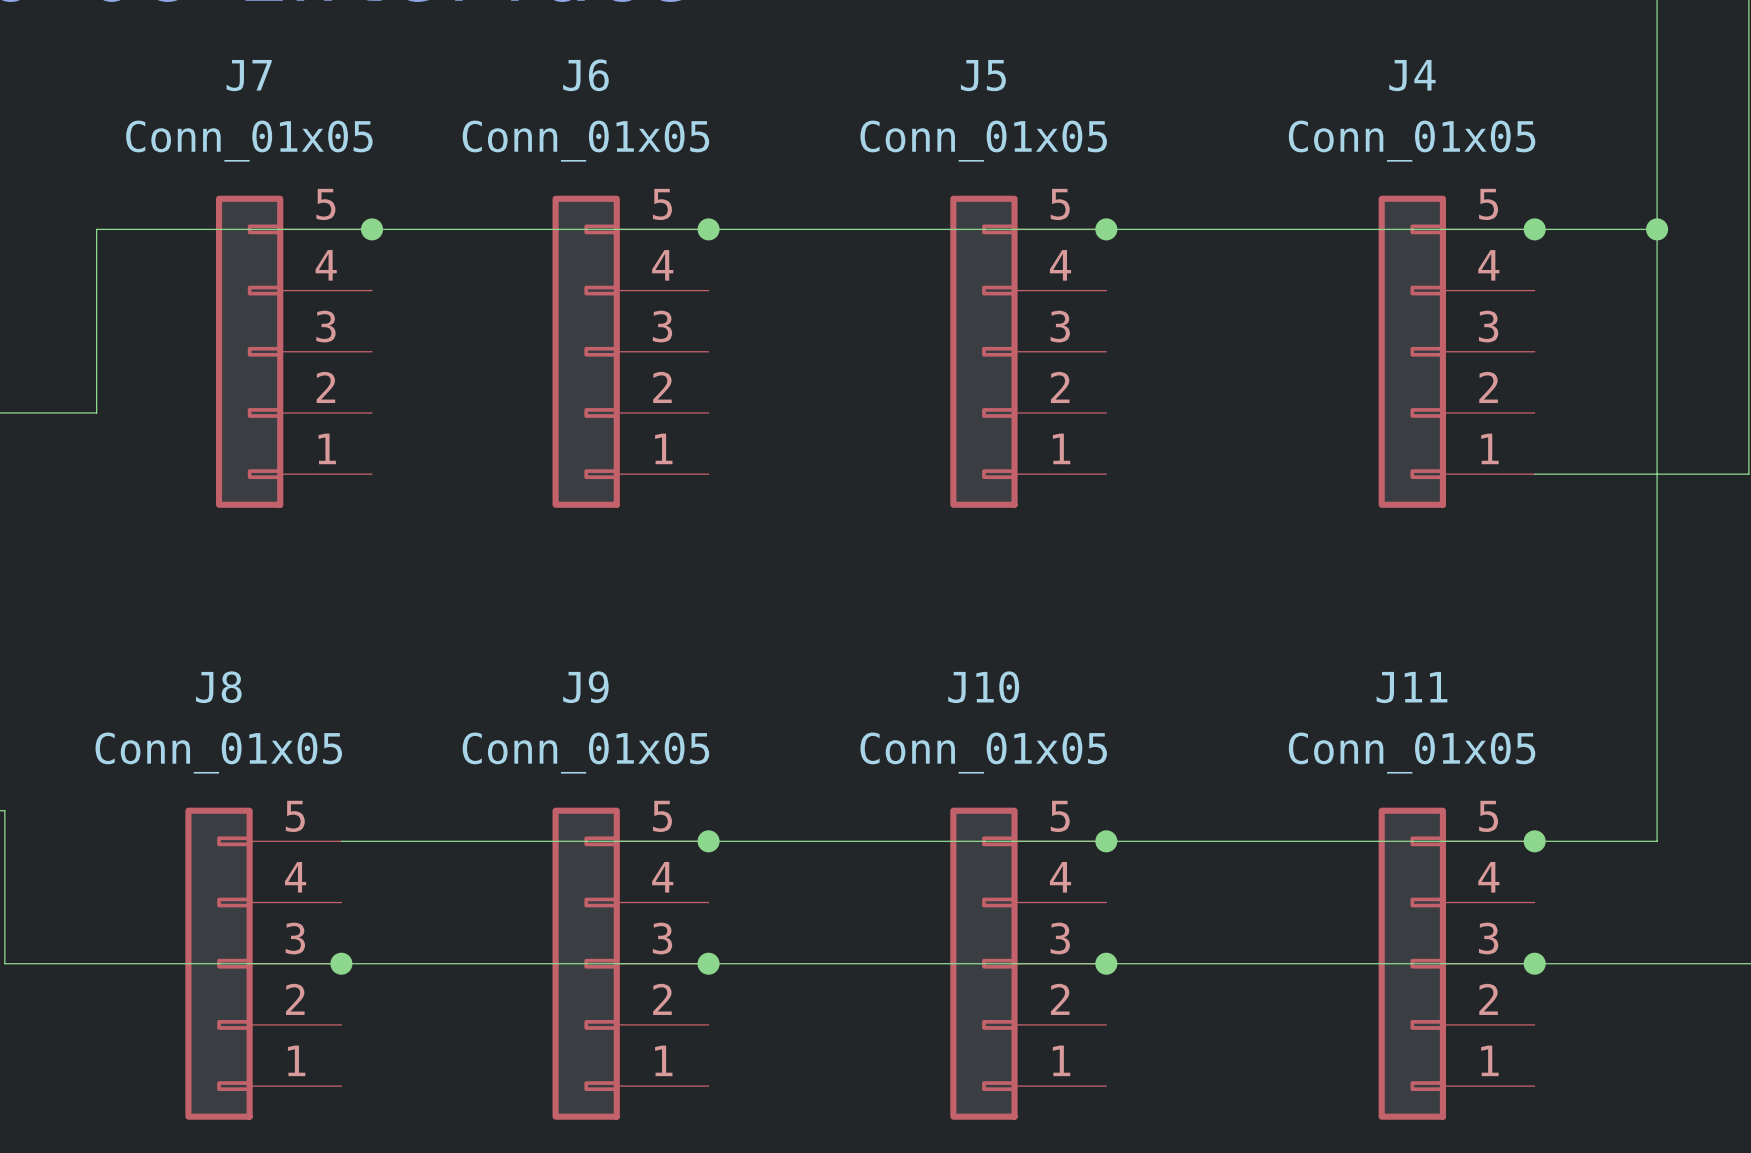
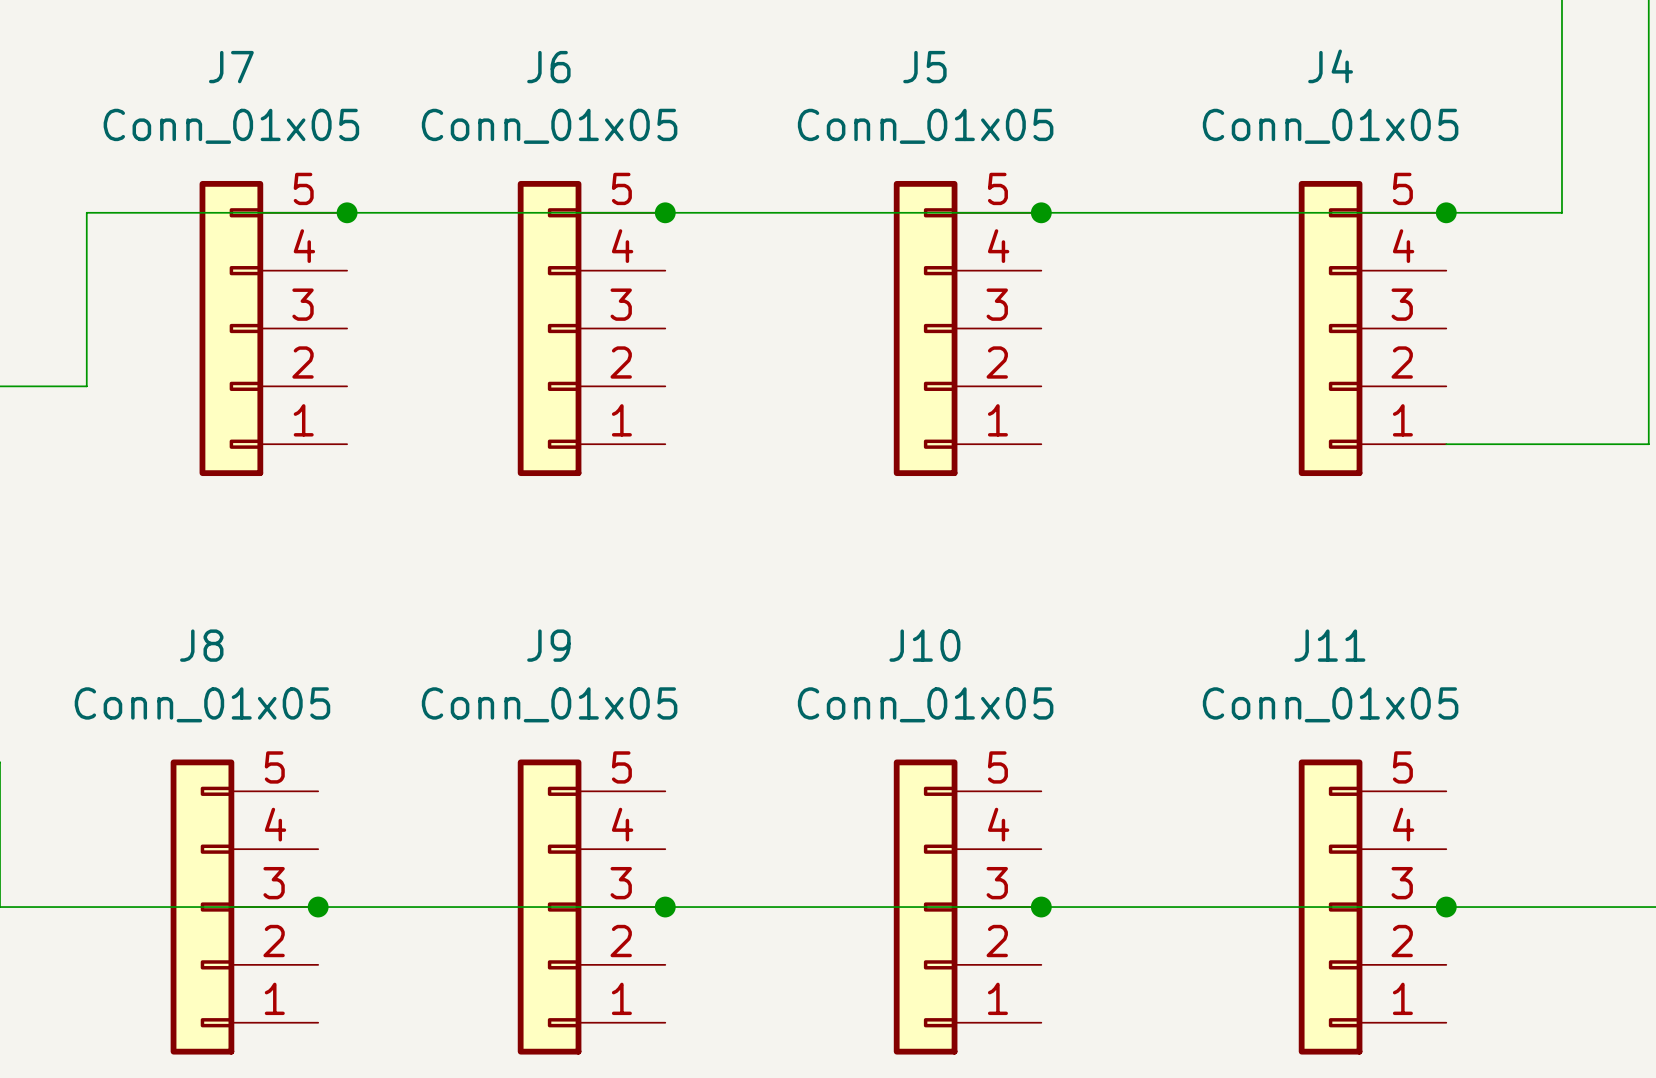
wire: (1657, 229) (1657, 841) (341, 841) -> none
junction: (1657, 229) -> none
junction: (708, 841) -> none
junction: (1106, 841) -> none
junction: (1534, 841) -> none

